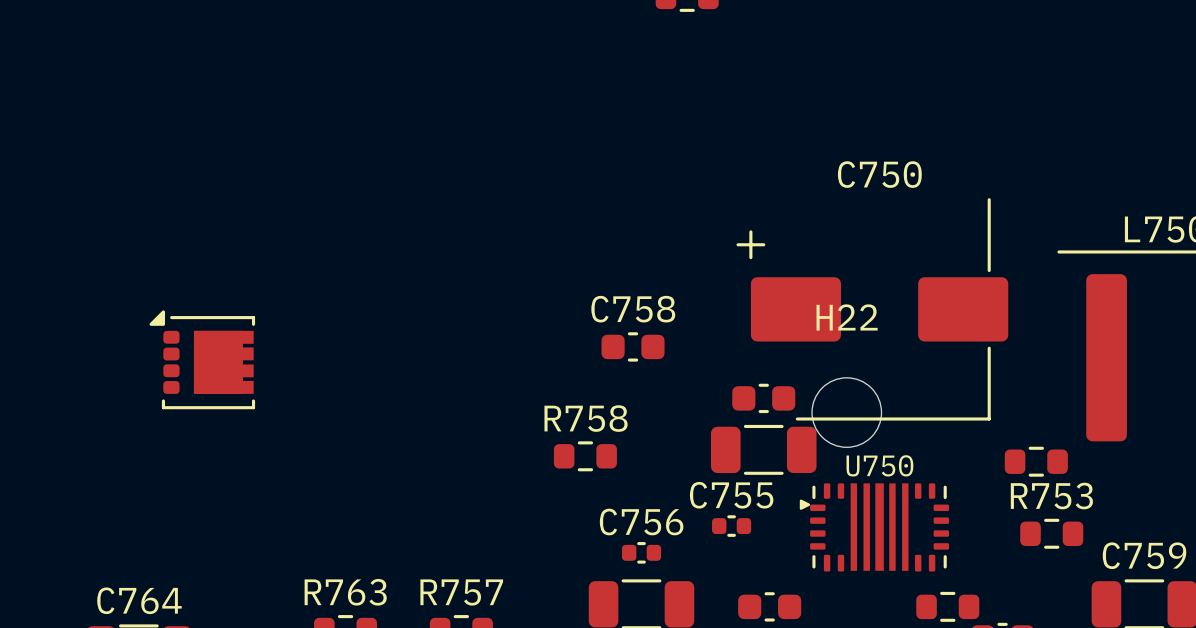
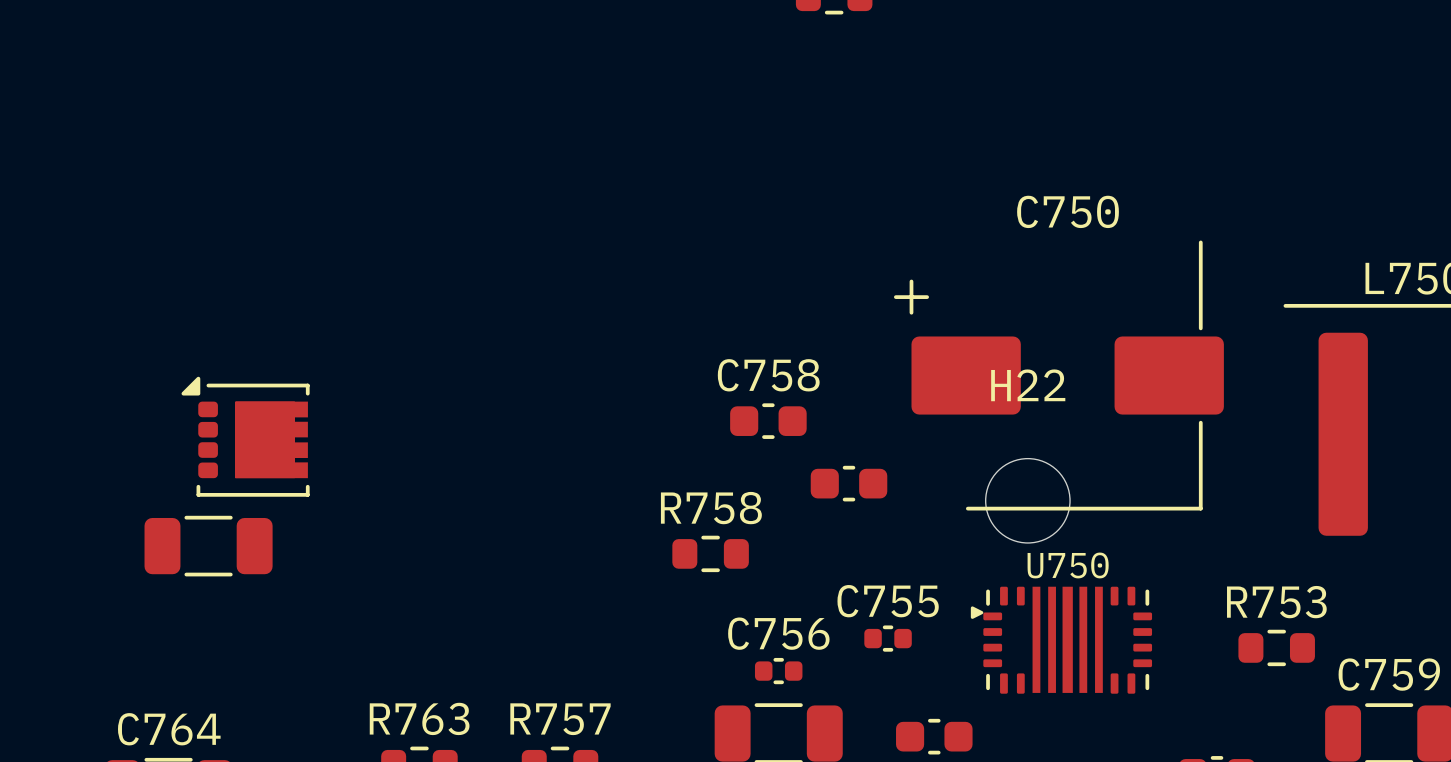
part position: (763, 398) -> (849, 483)
part position: (763, 449) -> (208, 546)
part: (1036, 461) -> none
part: (947, 606) -> none

